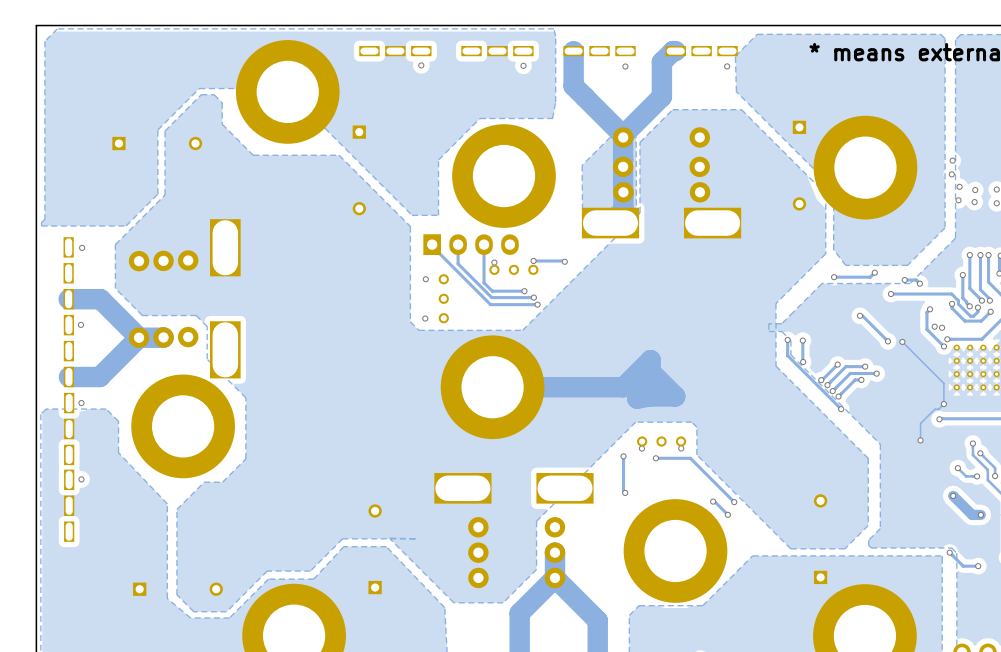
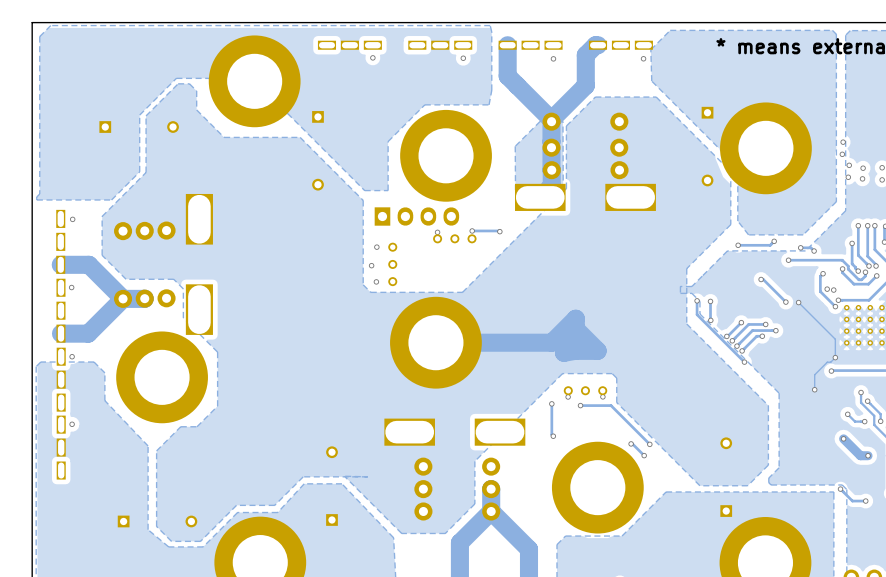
track: (458, 244) (458, 263) (491, 297) (533, 297) -> none
track: (484, 244) (484, 282) (492, 291) (524, 291) -> none
track: (432, 246) (490, 304) (537, 304) -> none
via: (524, 291) -> none
via: (533, 297) -> none
via: none -> (371, 265)
via: (537, 304) -> none

